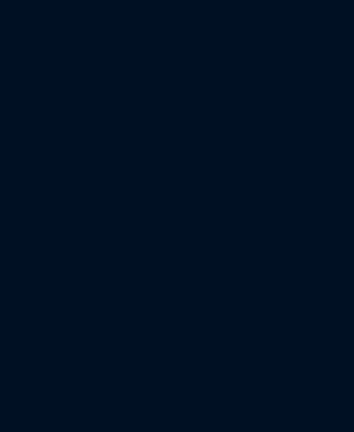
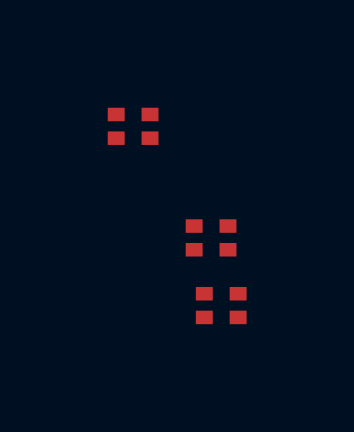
part: none -> (133, 126)
part: none -> (211, 237)
part: none -> (221, 305)

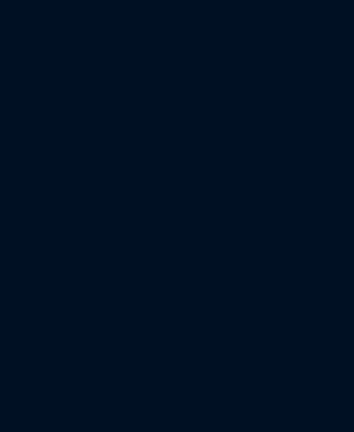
part: (133, 126) -> none
part: (211, 237) -> none
part: (221, 305) -> none

